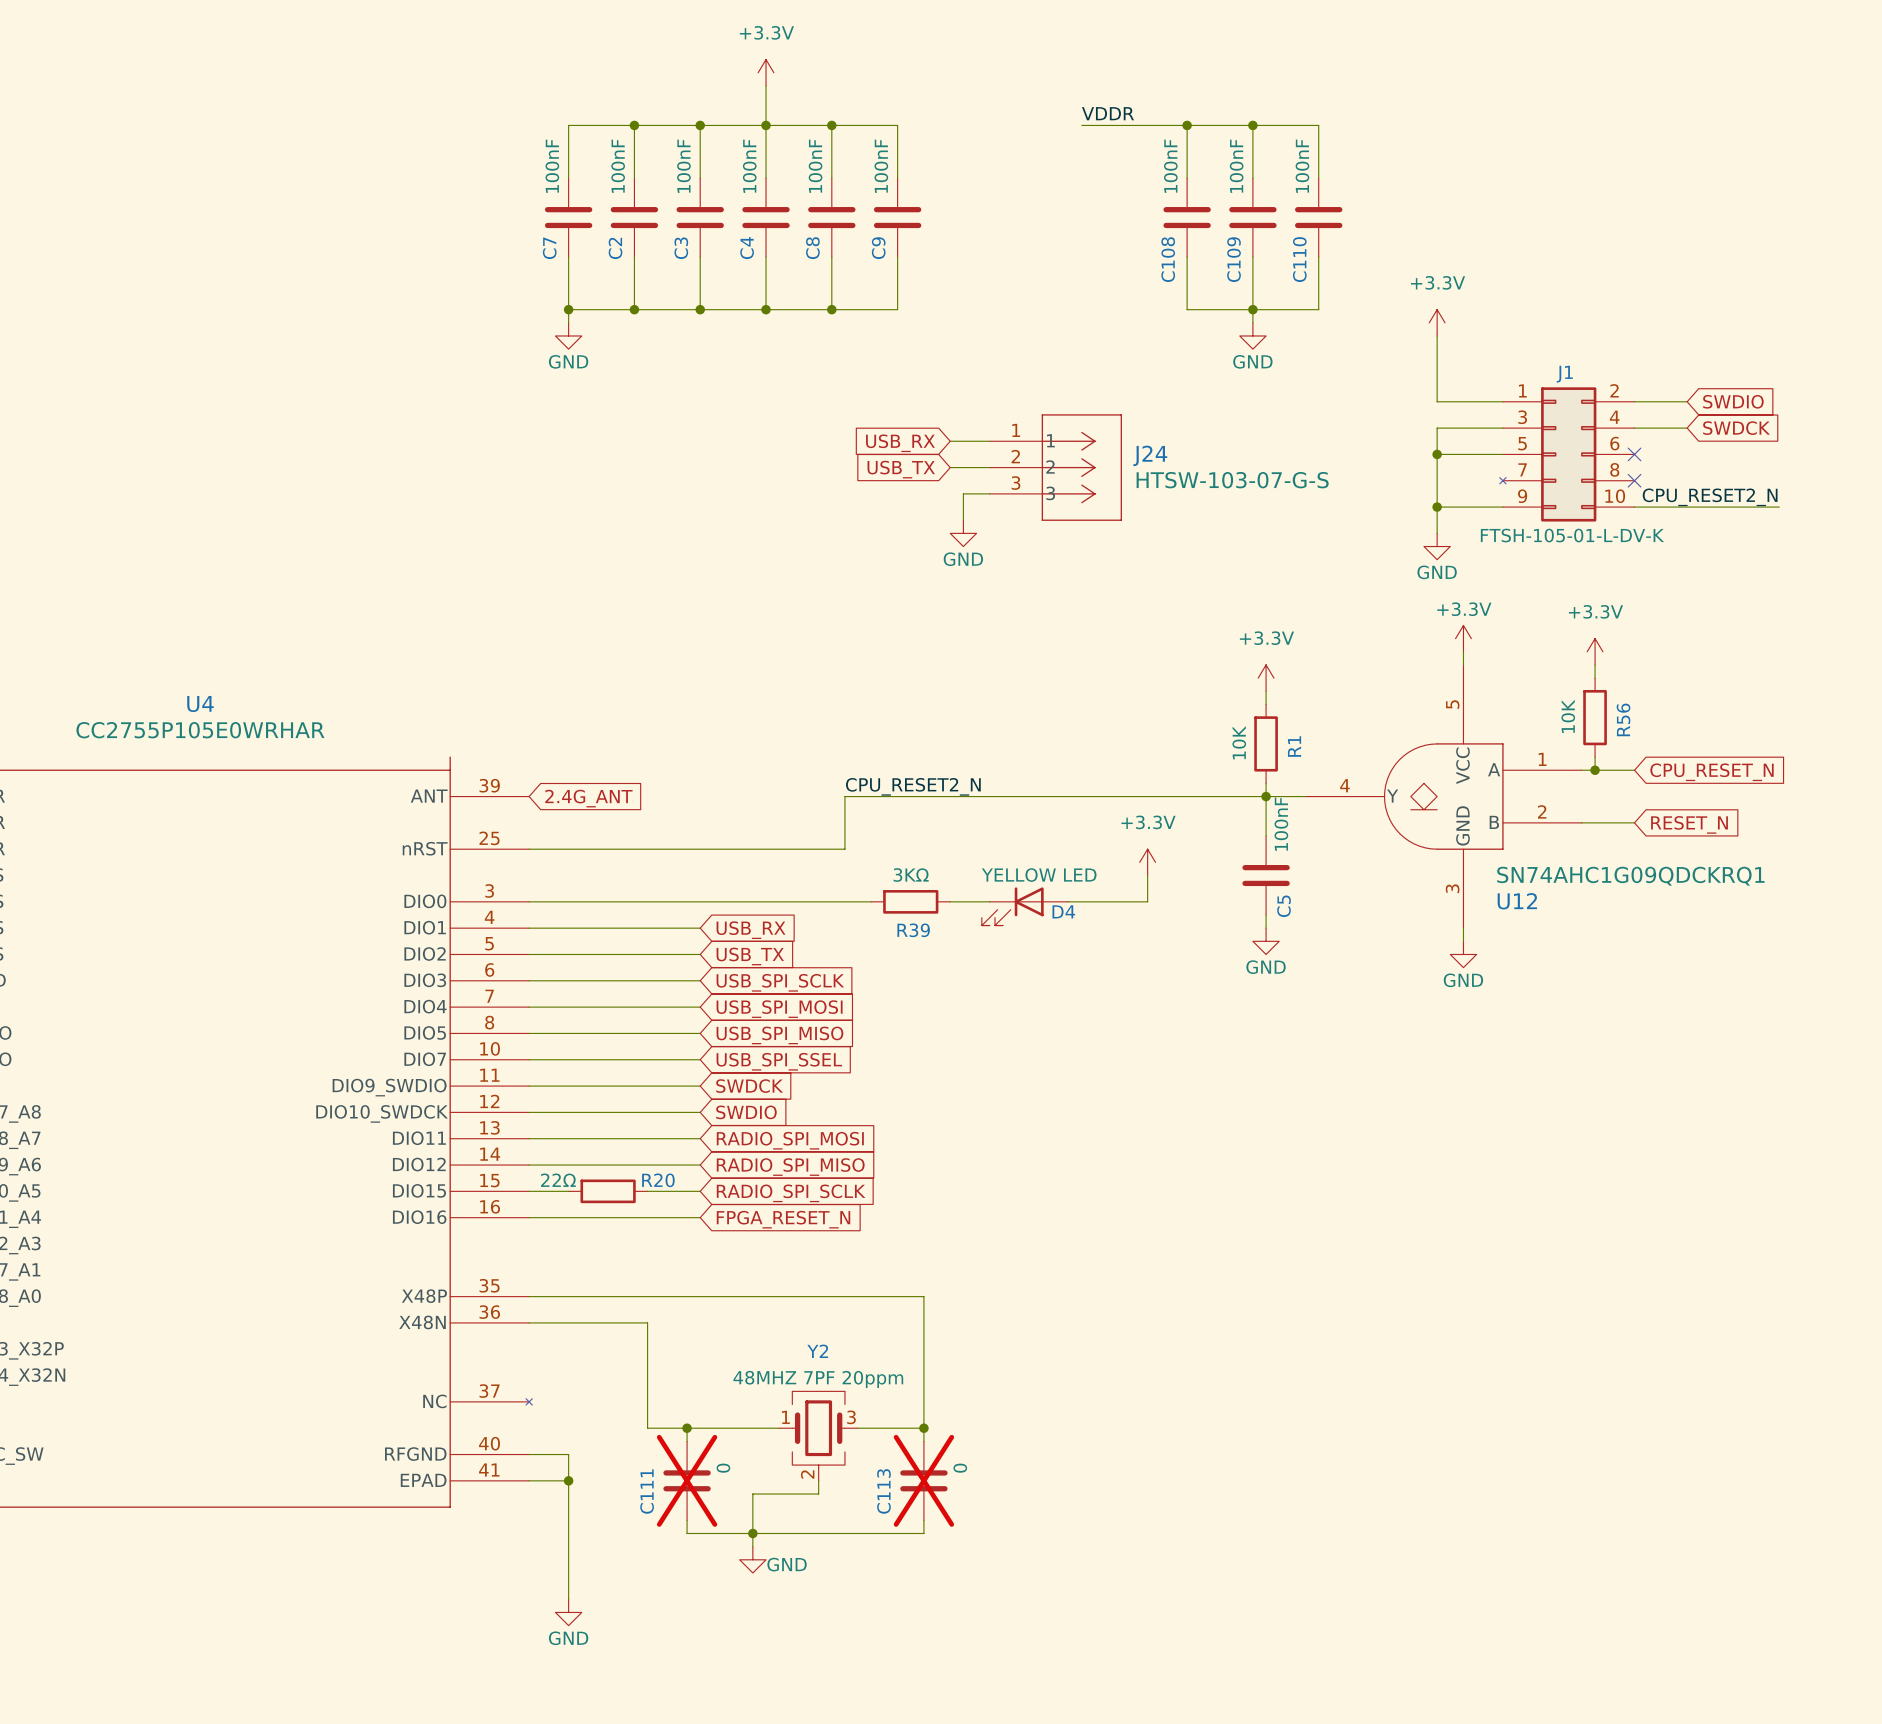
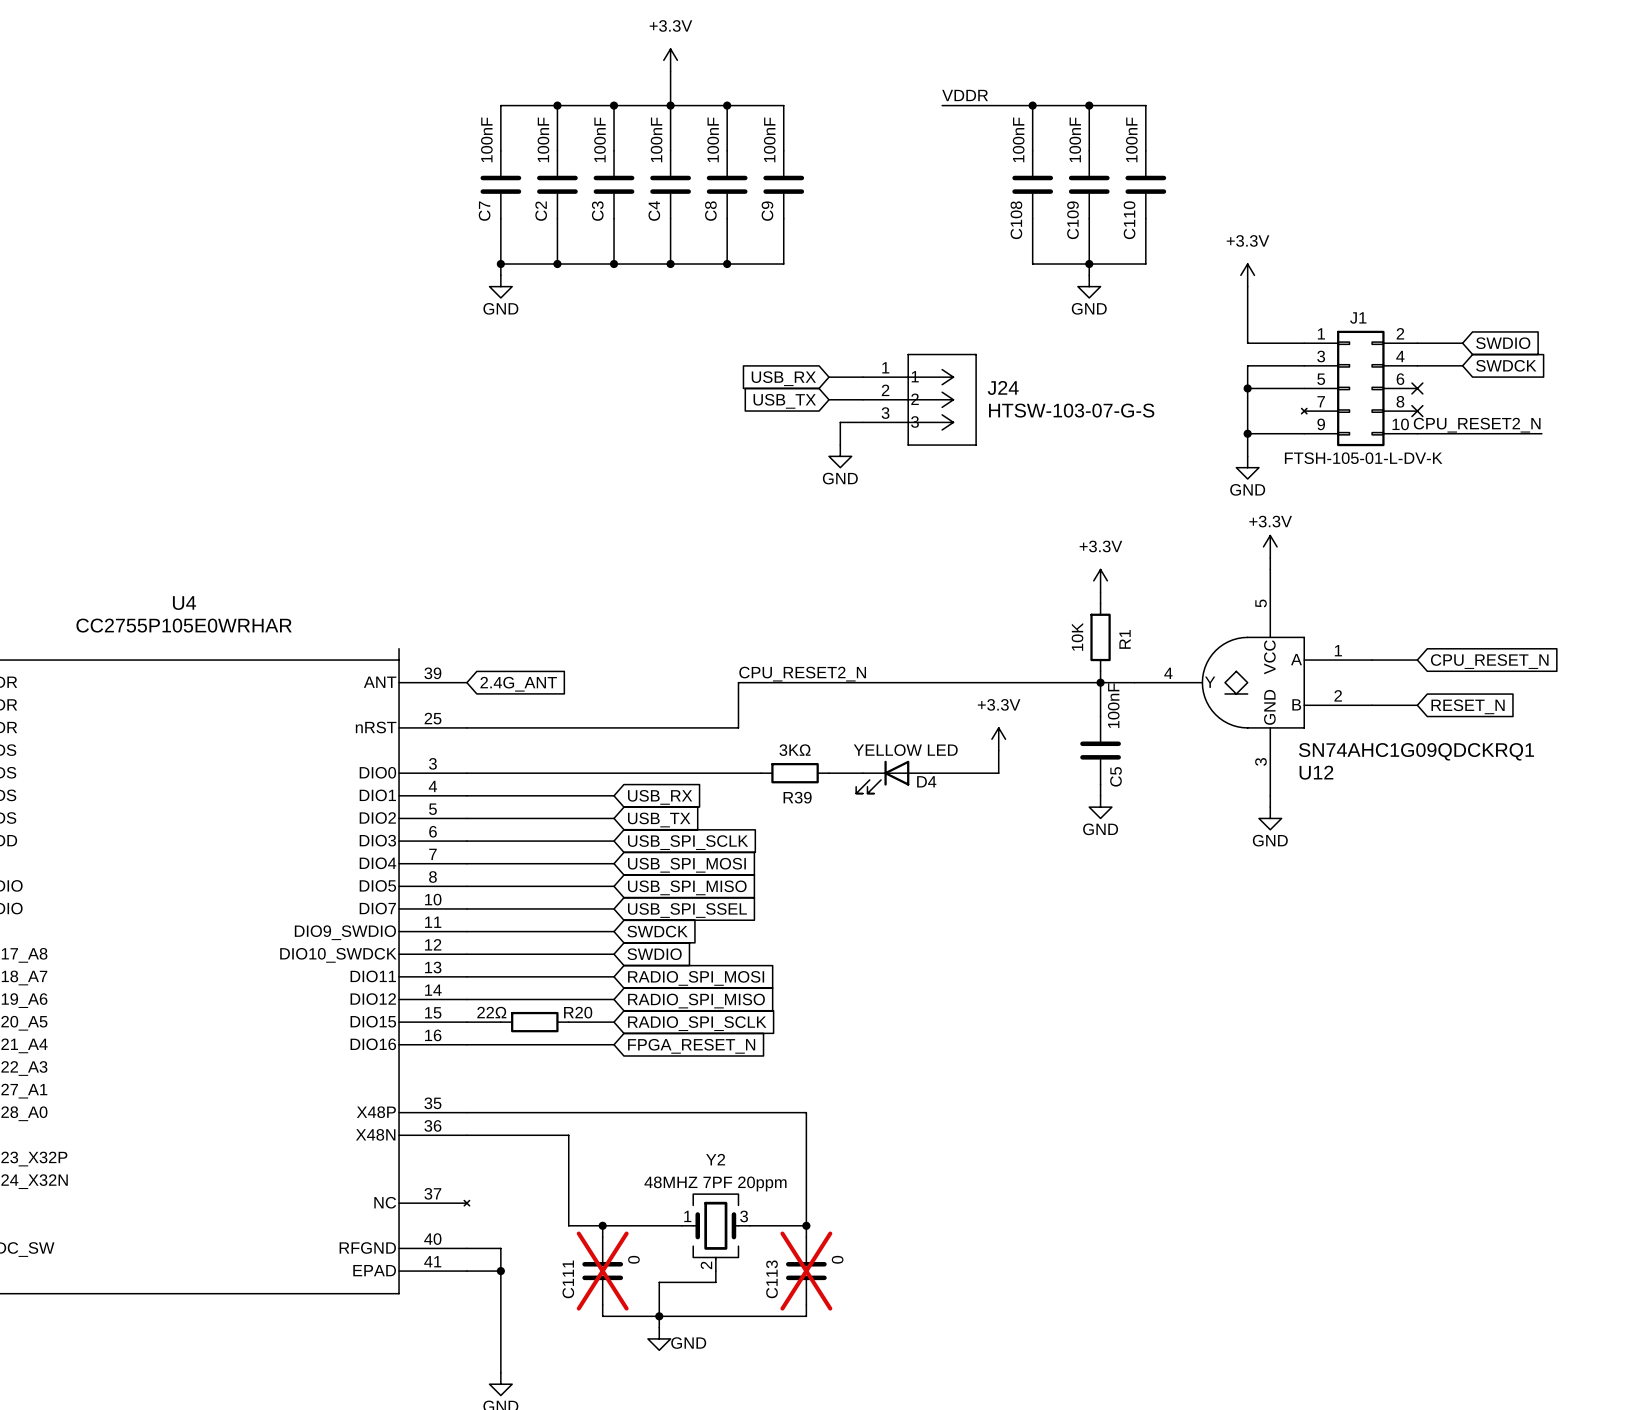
power symbol: +3.3V (1595, 651) -> none
wire: (1595, 664) (1595, 678) -> none
R56: 10K (1595, 717) -> none
wire: (1595, 757) (1595, 770) -> none
junction: (1595, 770) -> none

